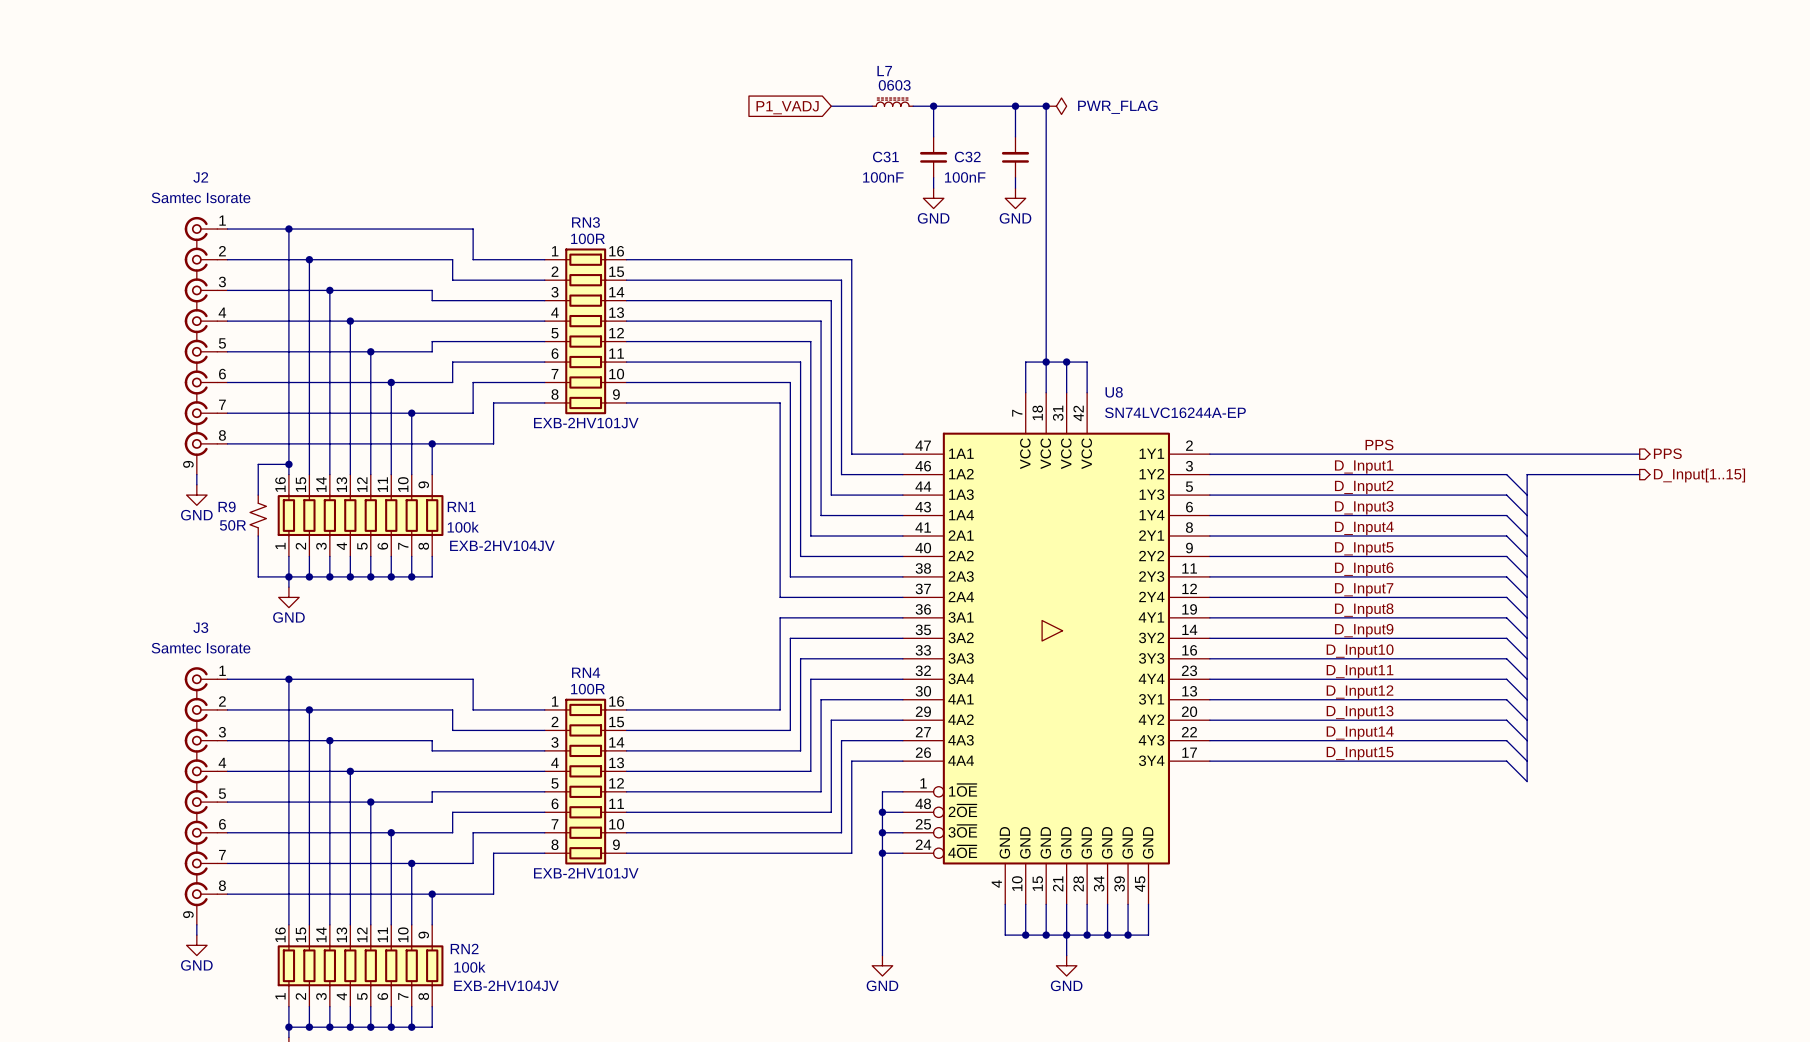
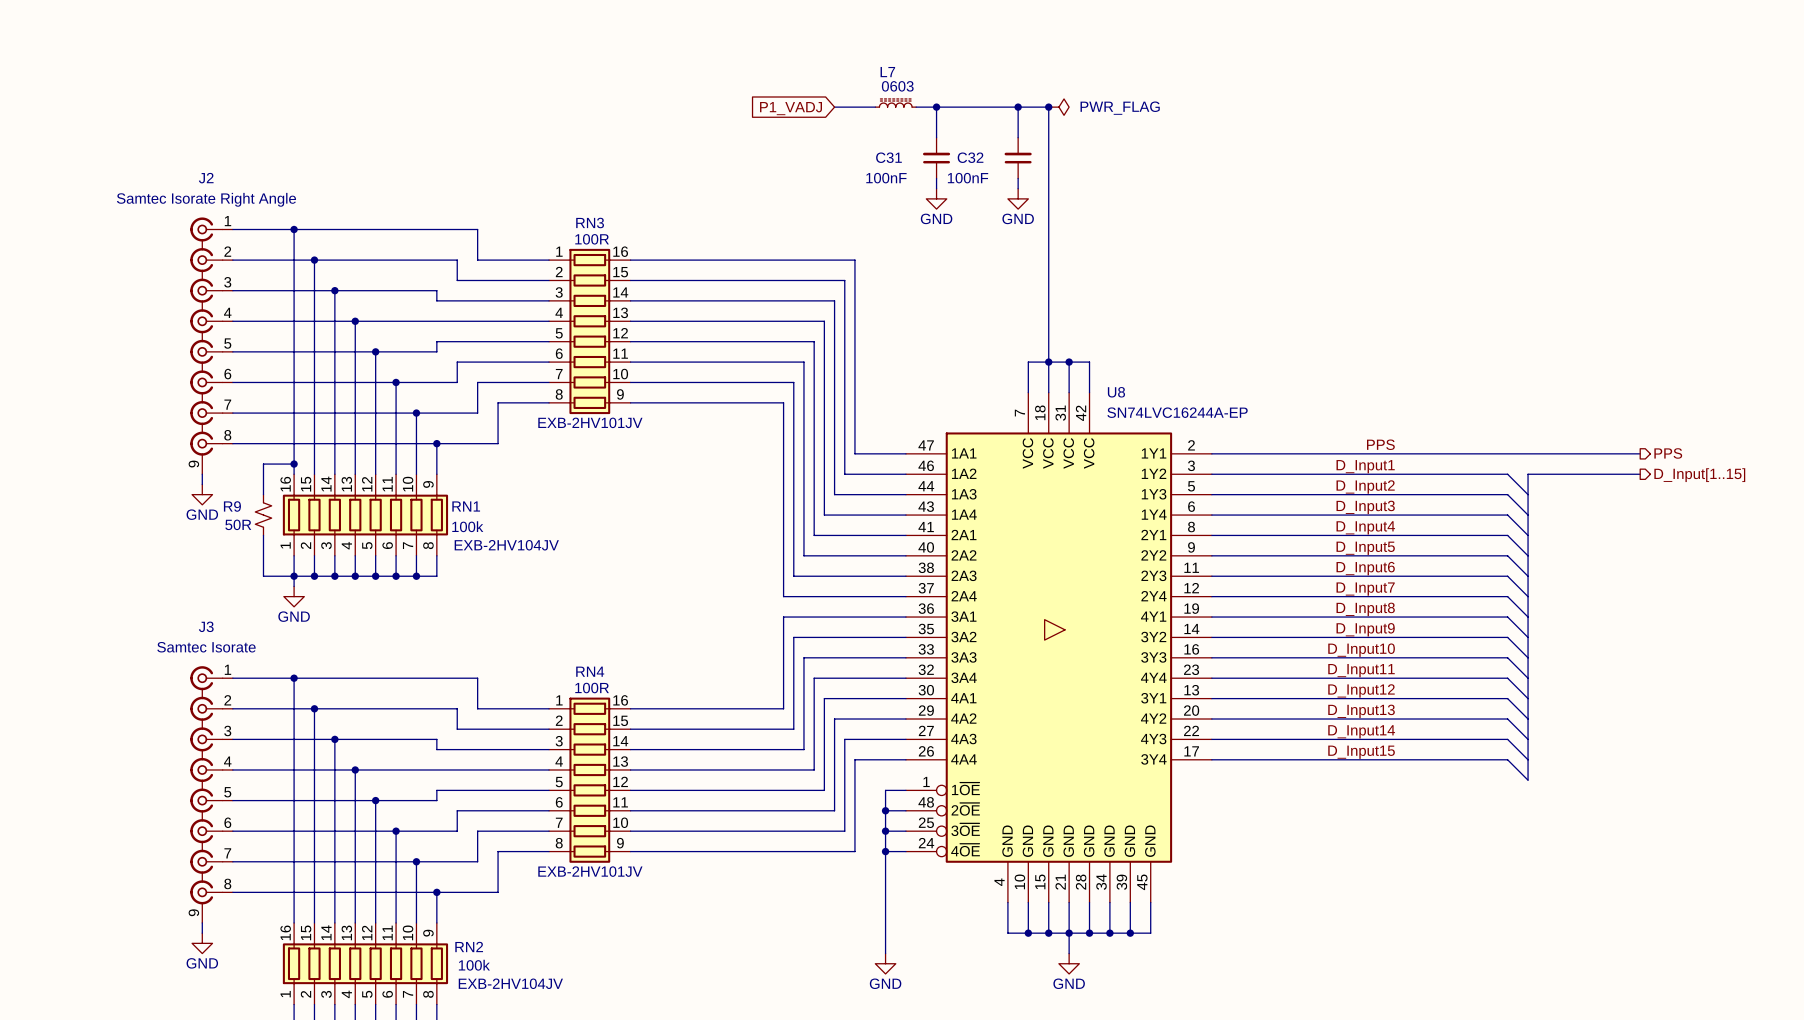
J2 value: Samtec Isorate (201, 197) -> Samtec Isorate Right Angle (206, 199)

